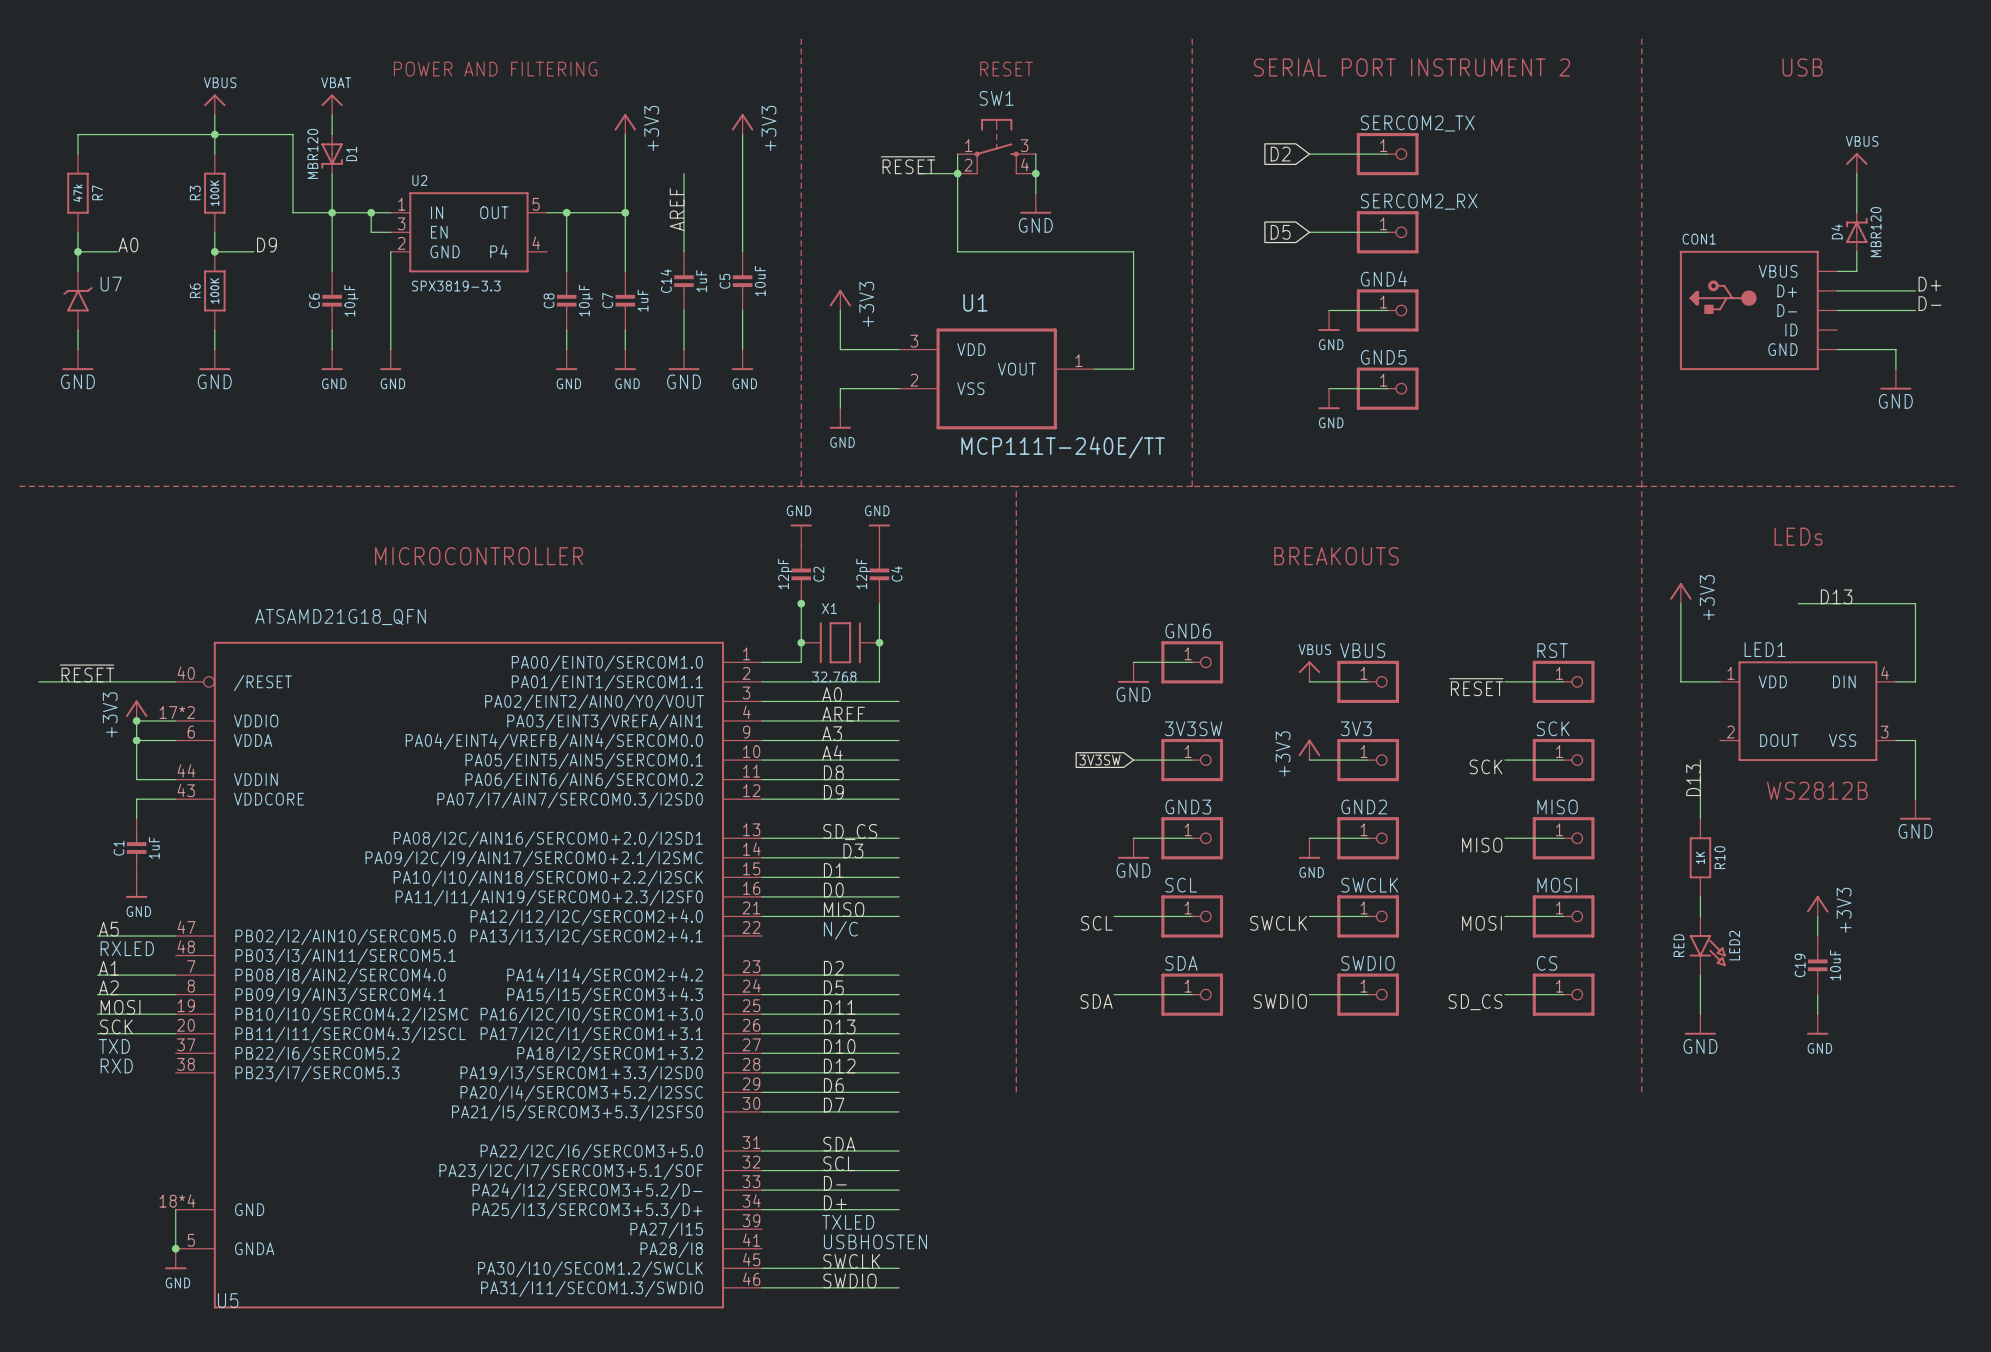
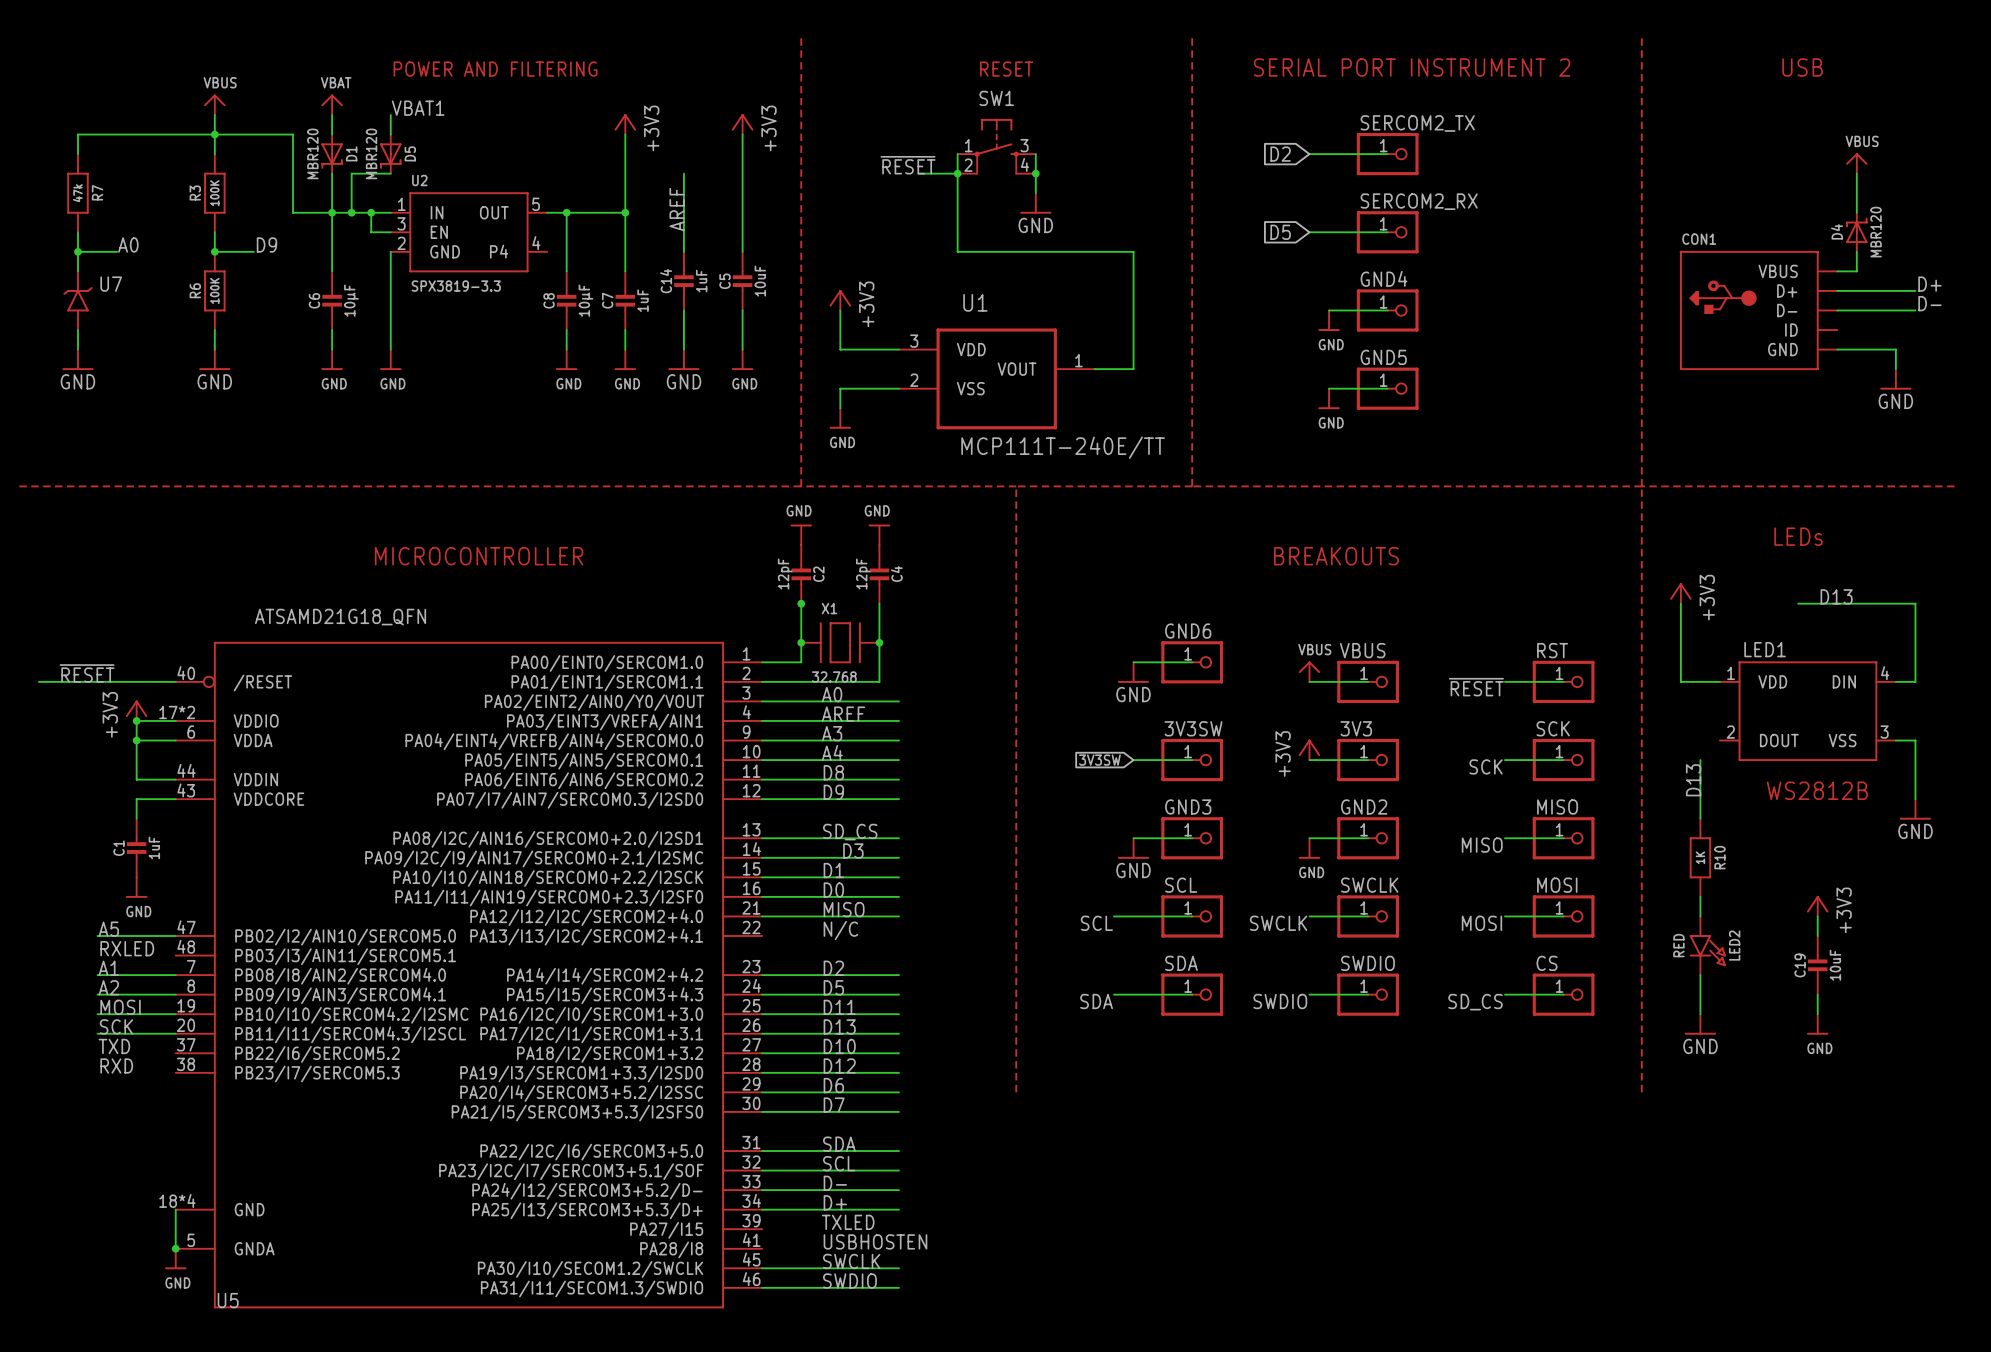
label: none -> VBAT1 (418, 108)
wire: none -> (390, 115) (390, 134)
D5: none -> MBR120 (390, 154)
wire: none -> (390, 173) (351, 173) (351, 212)
junction: none -> (351, 212)

